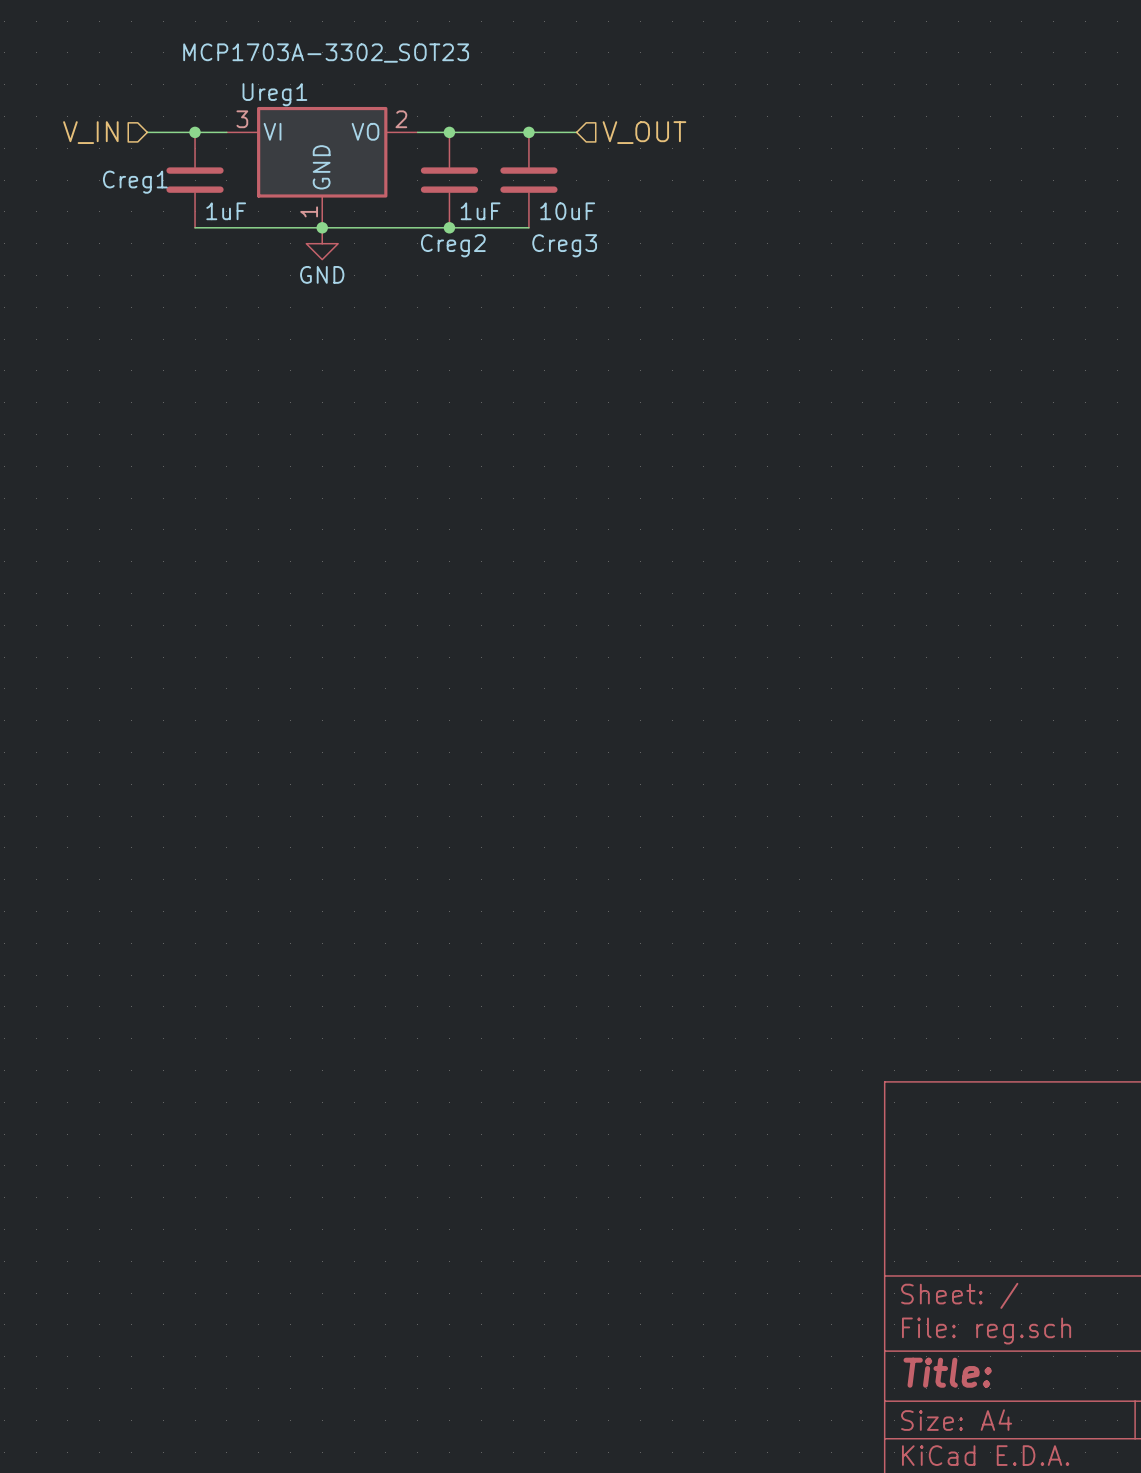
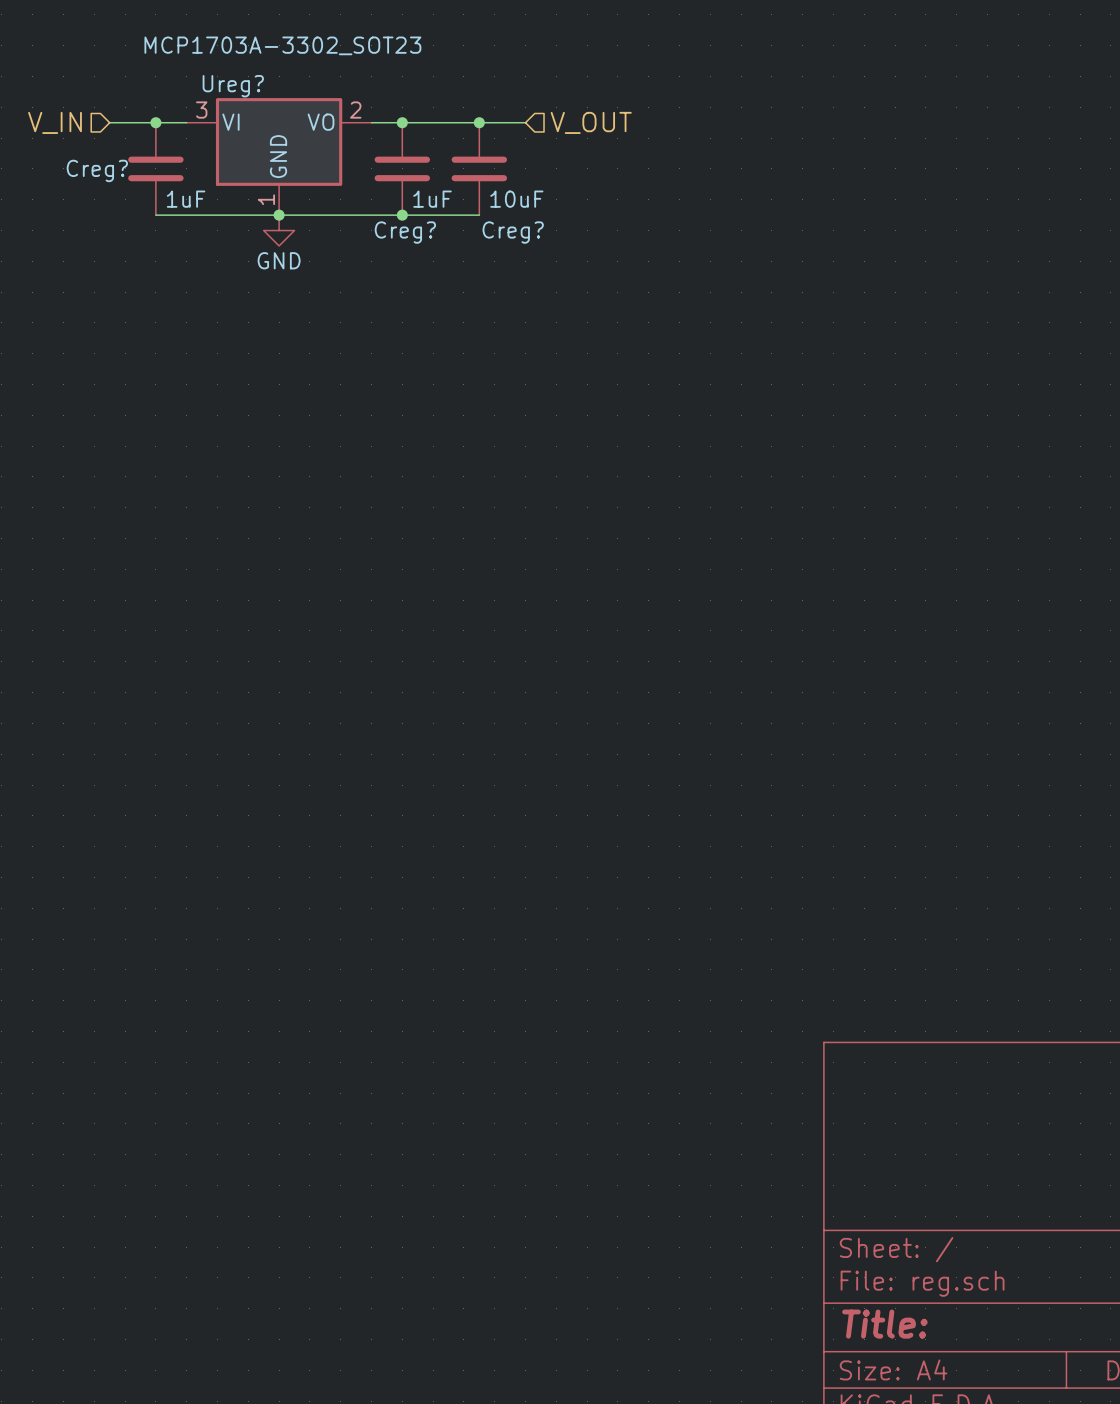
Ureg1 name: Ureg1 (274, 94) -> Ureg? (233, 86)
Creg1 name: Creg1 (135, 182) -> Creg? (97, 170)
Creg2 name: Creg2 (453, 245) -> Creg? (405, 232)
Creg3 name: Creg3 (564, 245) -> Creg? (513, 232)

